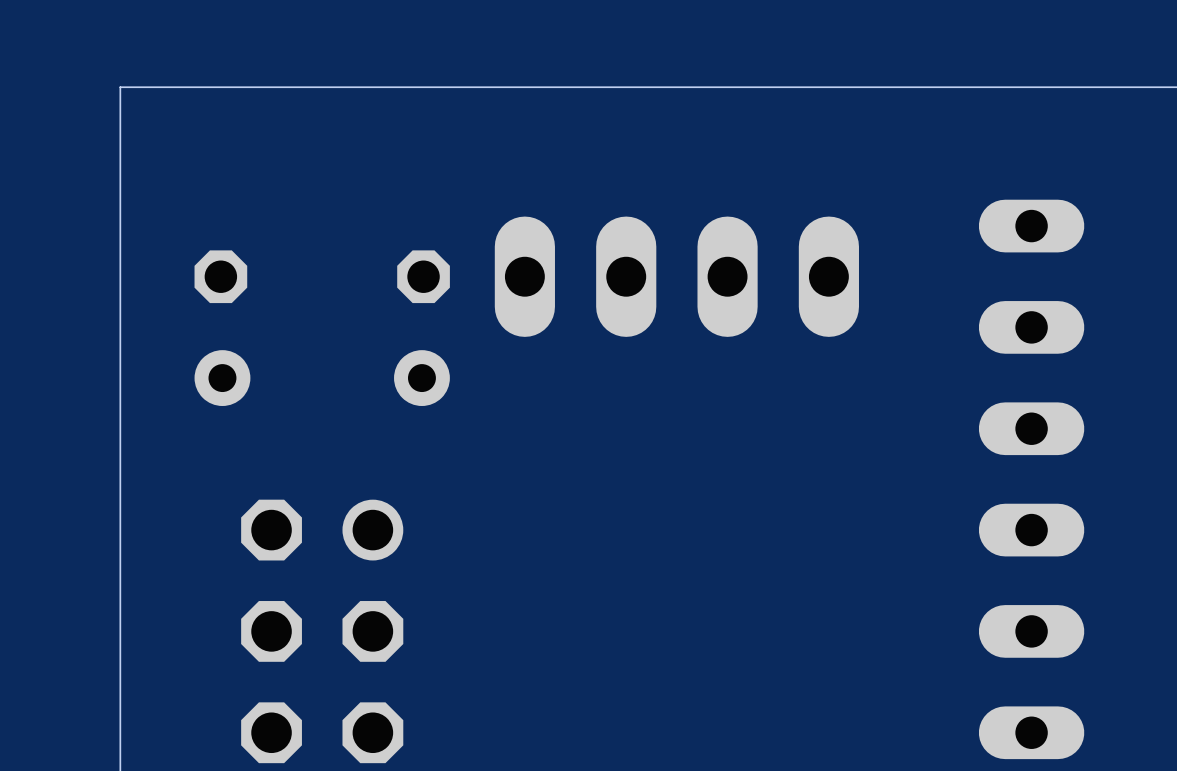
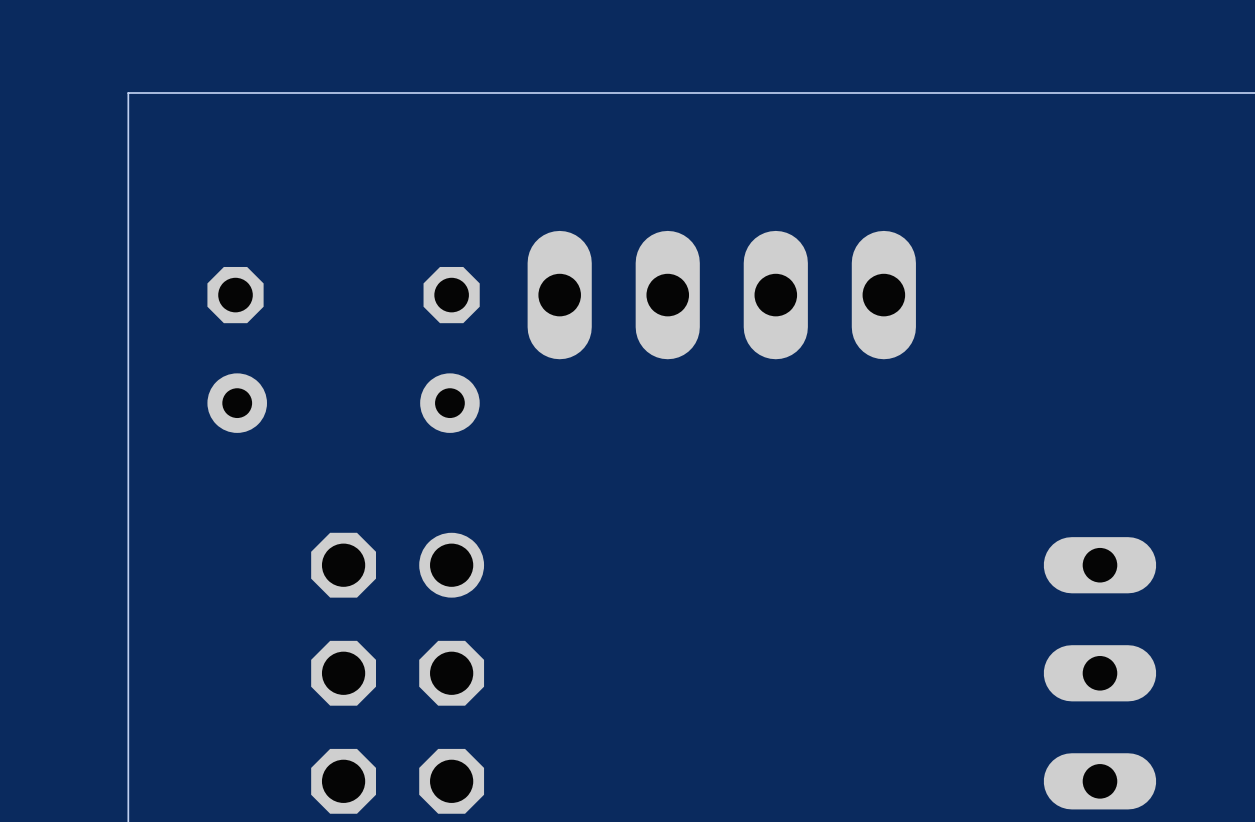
part: (1031, 327) -> none
part position: (322, 631) -> (397, 673)

